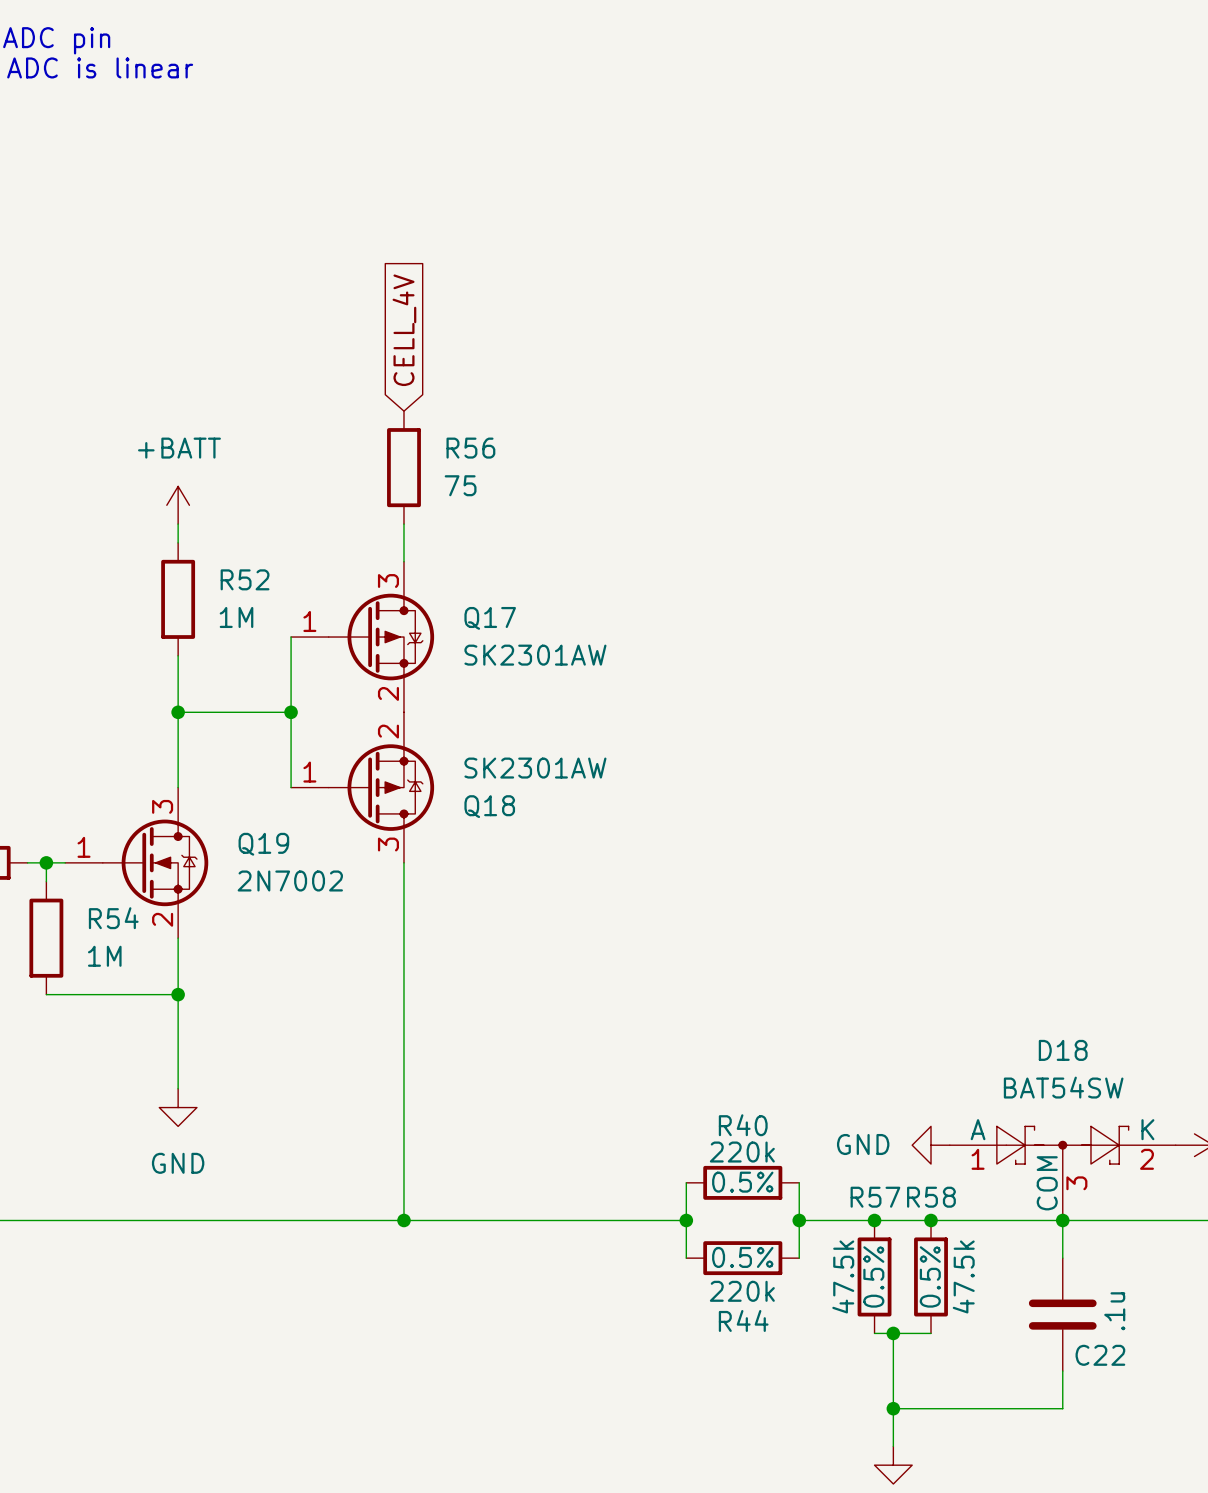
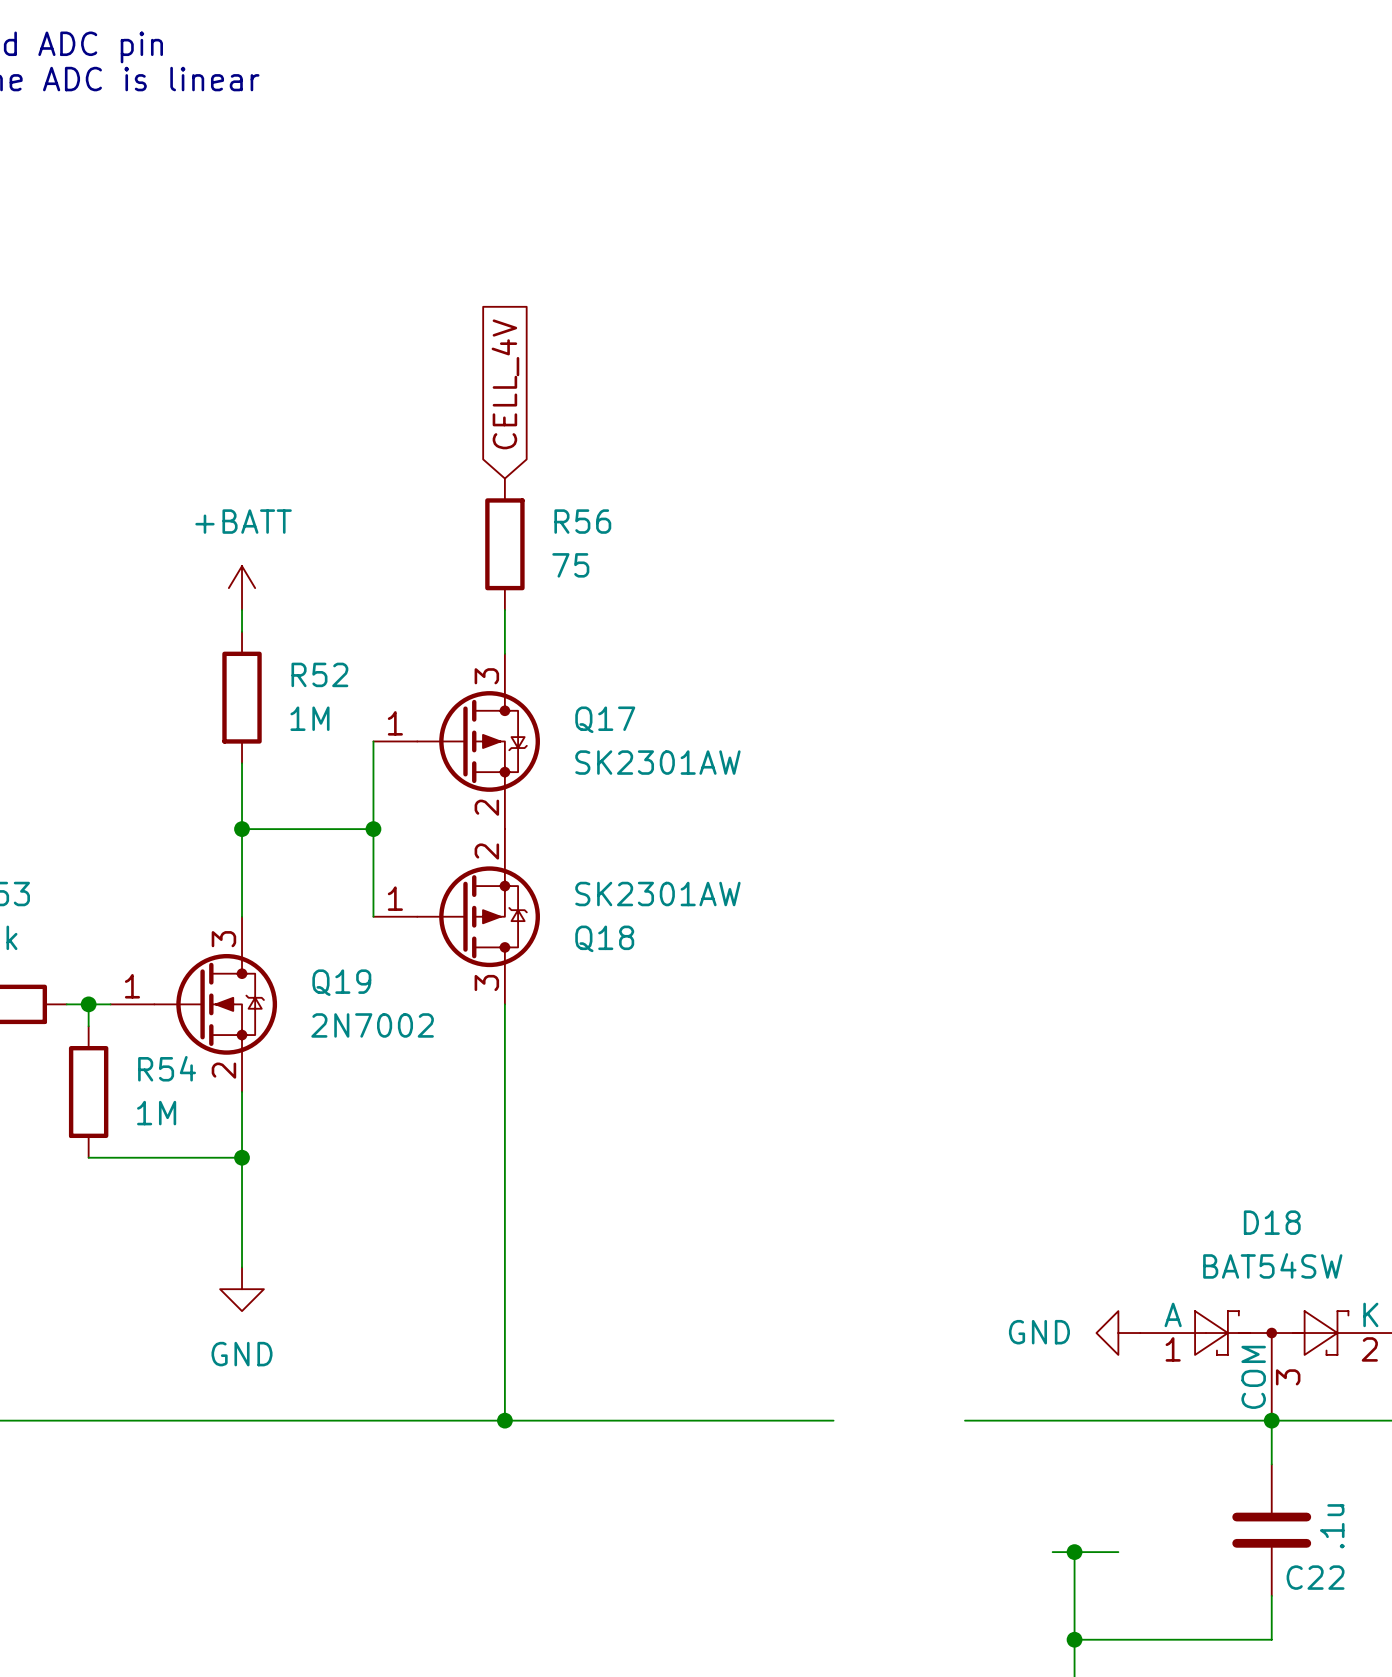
wire: (686, 1182) (686, 1258) -> none
R40: 220k (742, 1182) -> none
wire: (799, 1182) (799, 1258) -> none
junction: (686, 1220) -> none
junction: (799, 1220) -> none
junction: (874, 1220) -> none
junction: (931, 1220) -> none
R44: 220k (742, 1258) -> none
R57: 47.5k (874, 1276) -> none
R58: 47.5k (931, 1276) -> none

